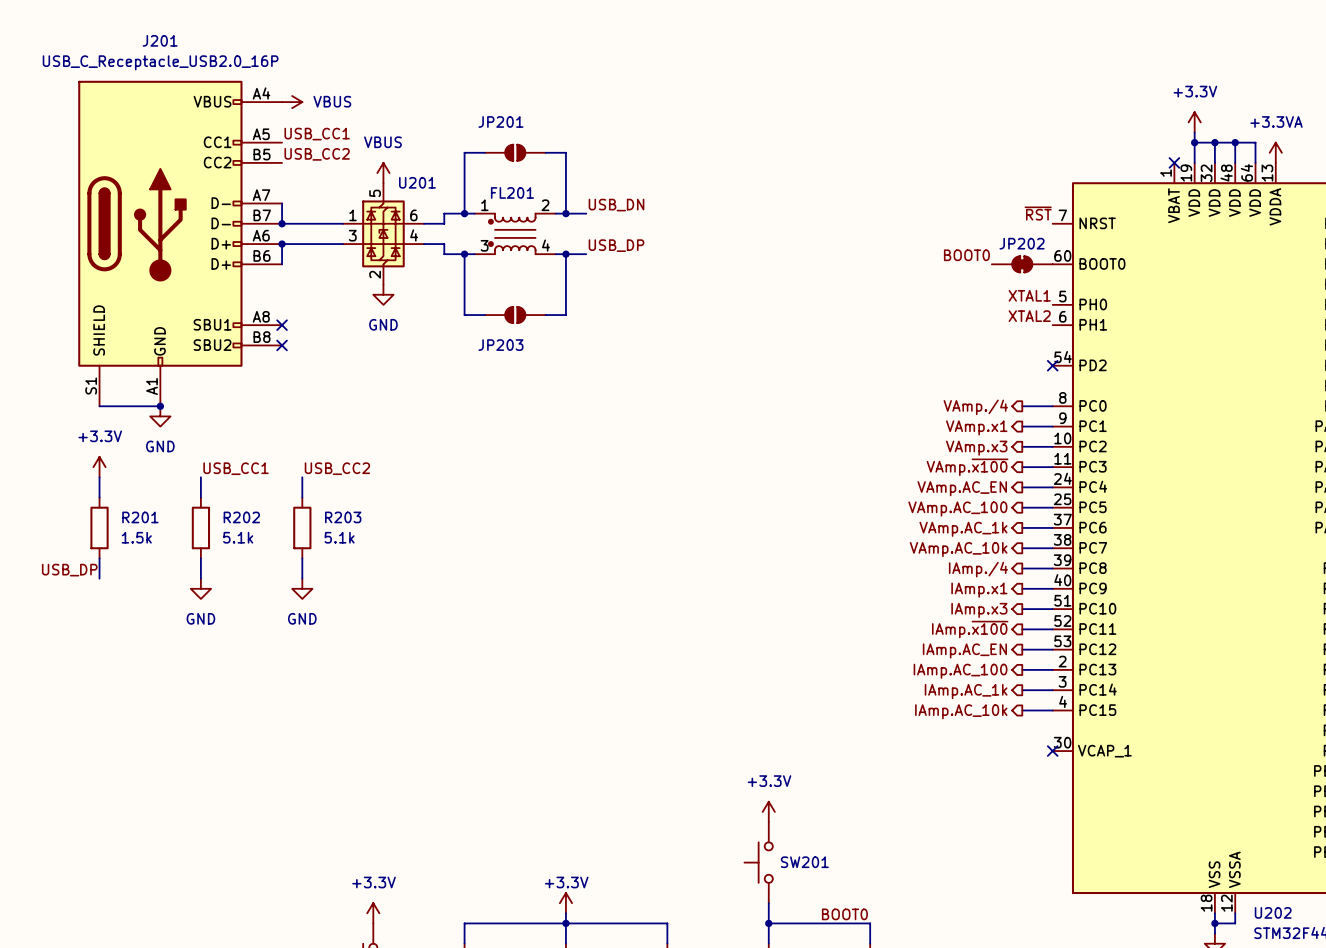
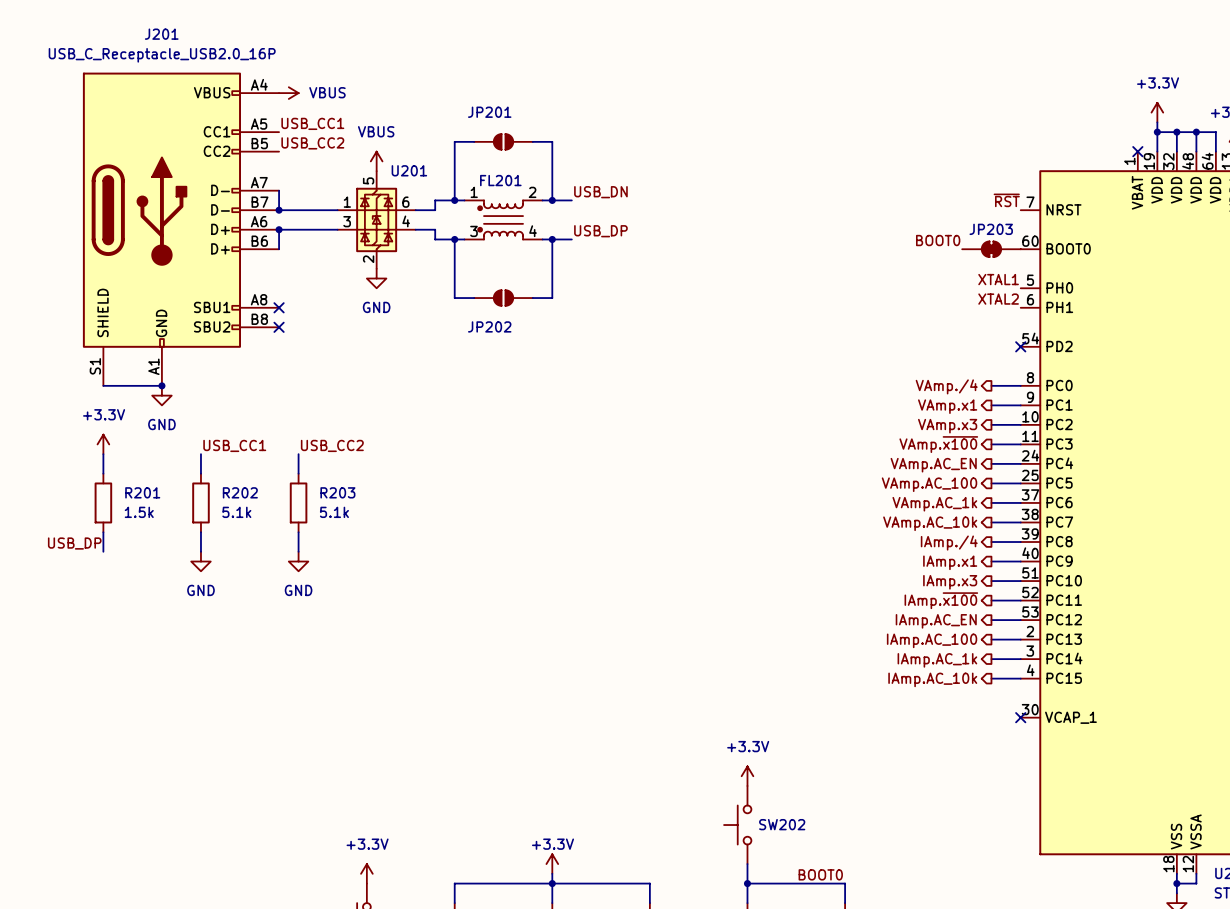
JP202 name: JP202 (1022, 243) -> JP203 (991, 229)
JP203 name: JP203 (500, 345) -> JP202 (489, 326)
SW201 name: SW201 (804, 862) -> SW202 (782, 824)

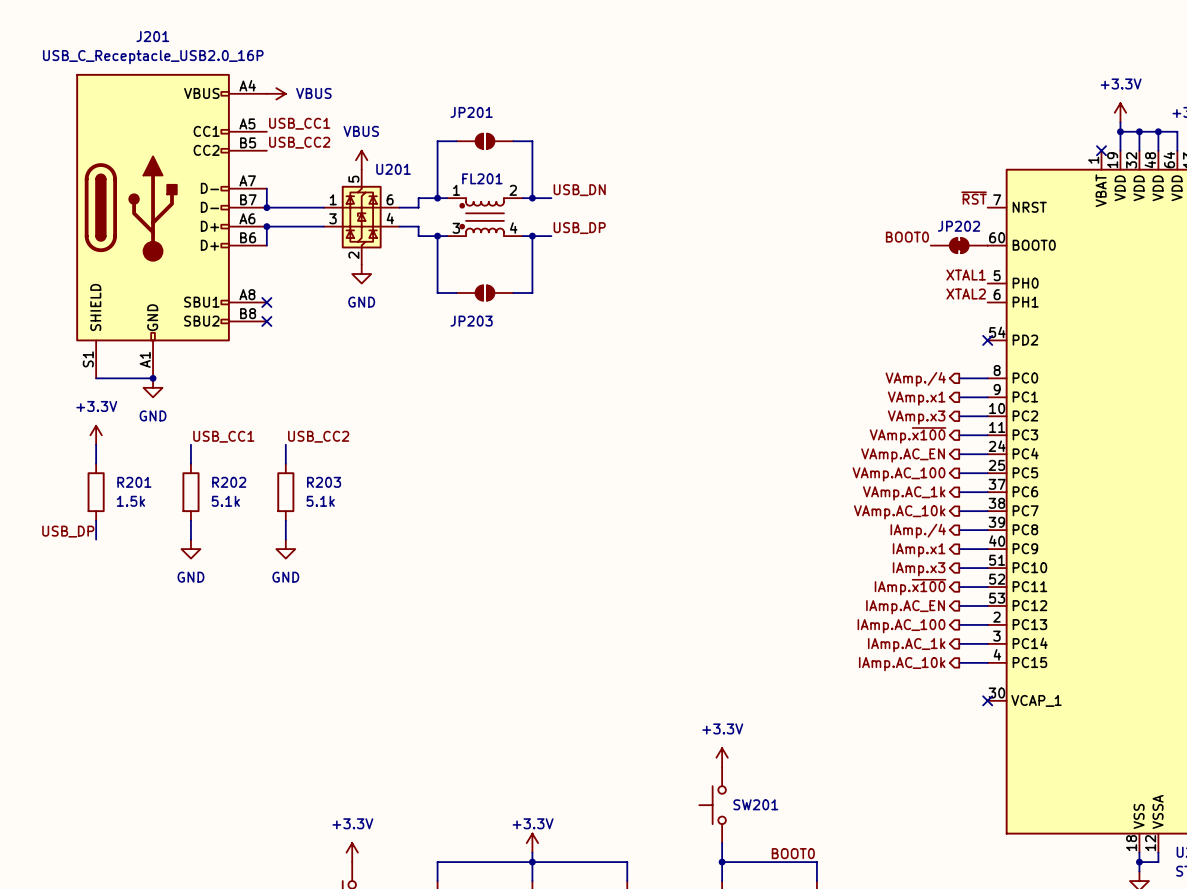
JP203 name: JP203 (991, 229) -> JP202 (959, 226)
JP202 name: JP202 (489, 326) -> JP203 (471, 321)
SW202 name: SW202 (782, 824) -> SW201 (755, 804)

